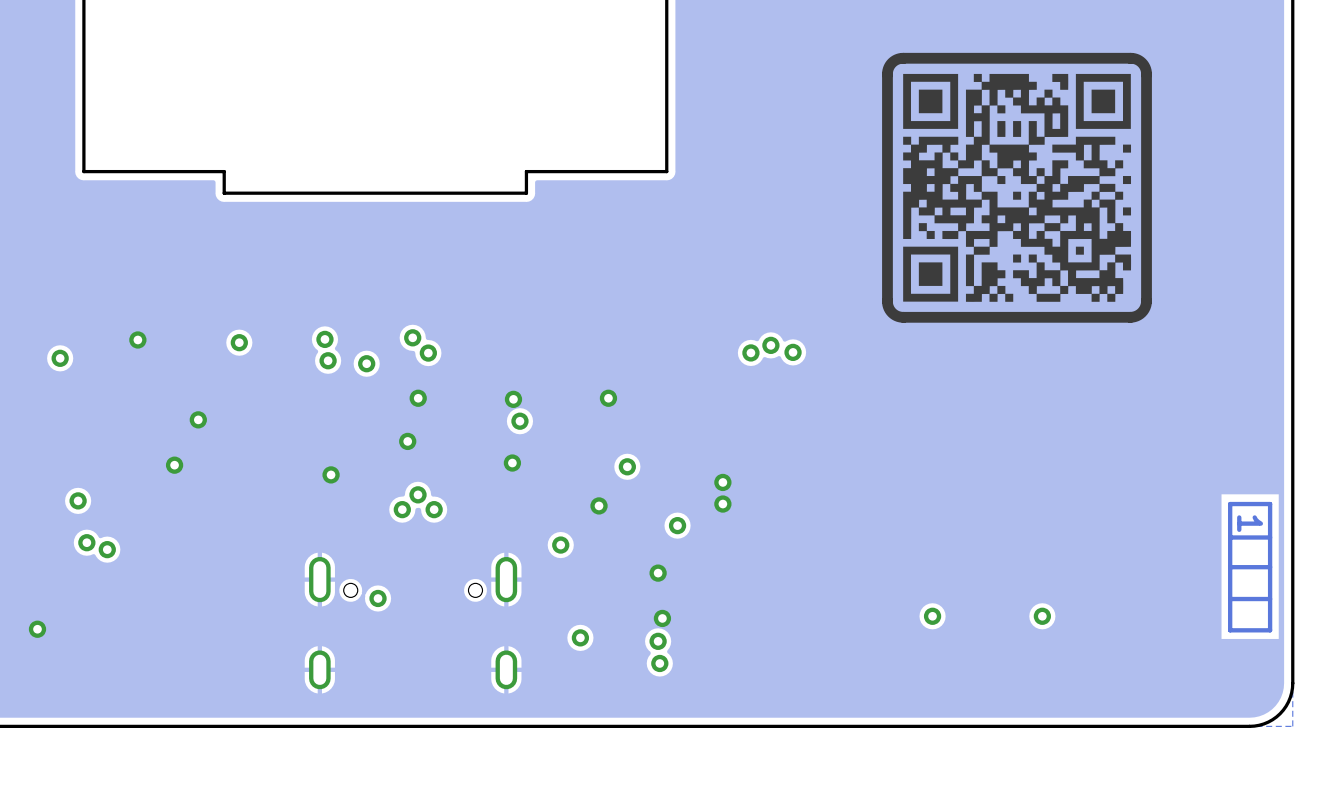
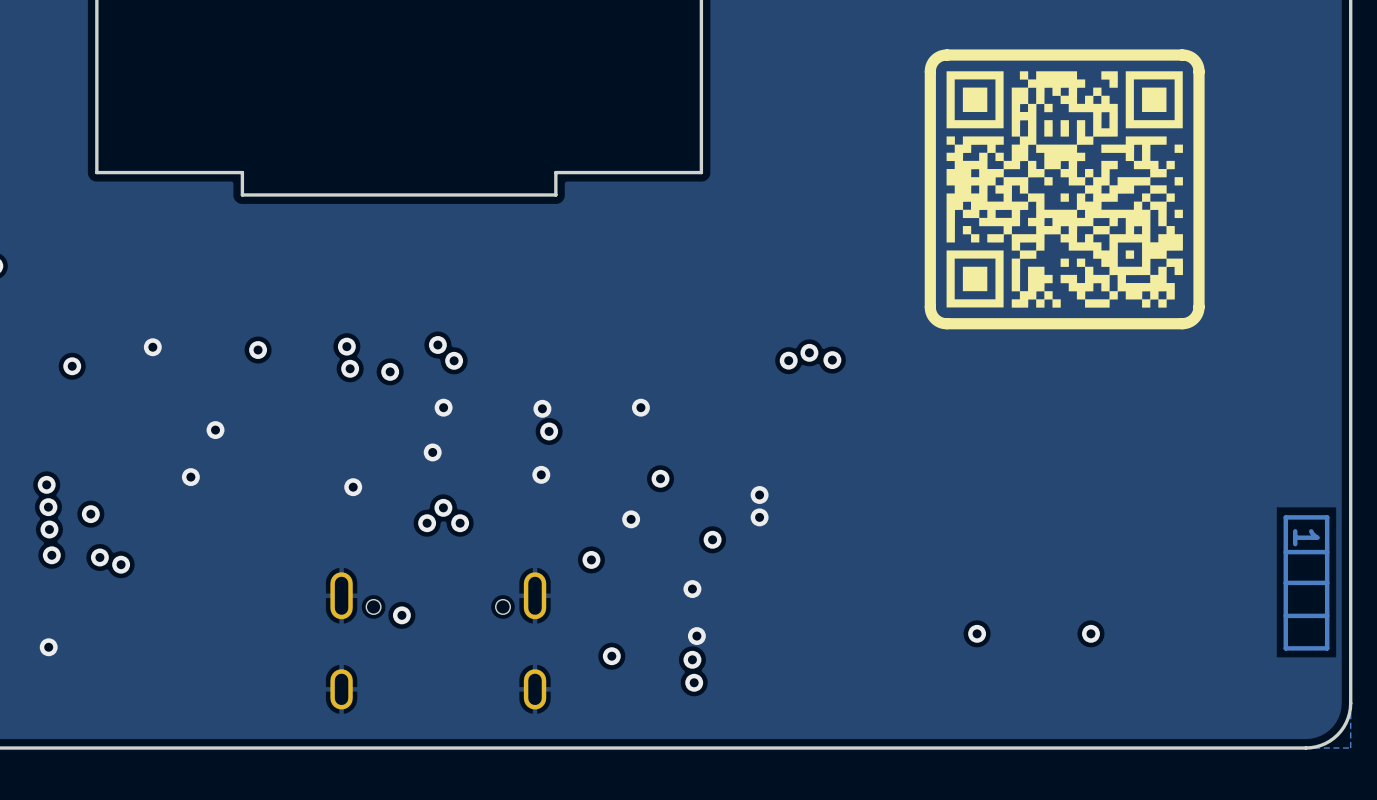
via: none -> (46, 484)
via: none -> (48, 507)
via: none -> (49, 529)
via: none -> (51, 555)

